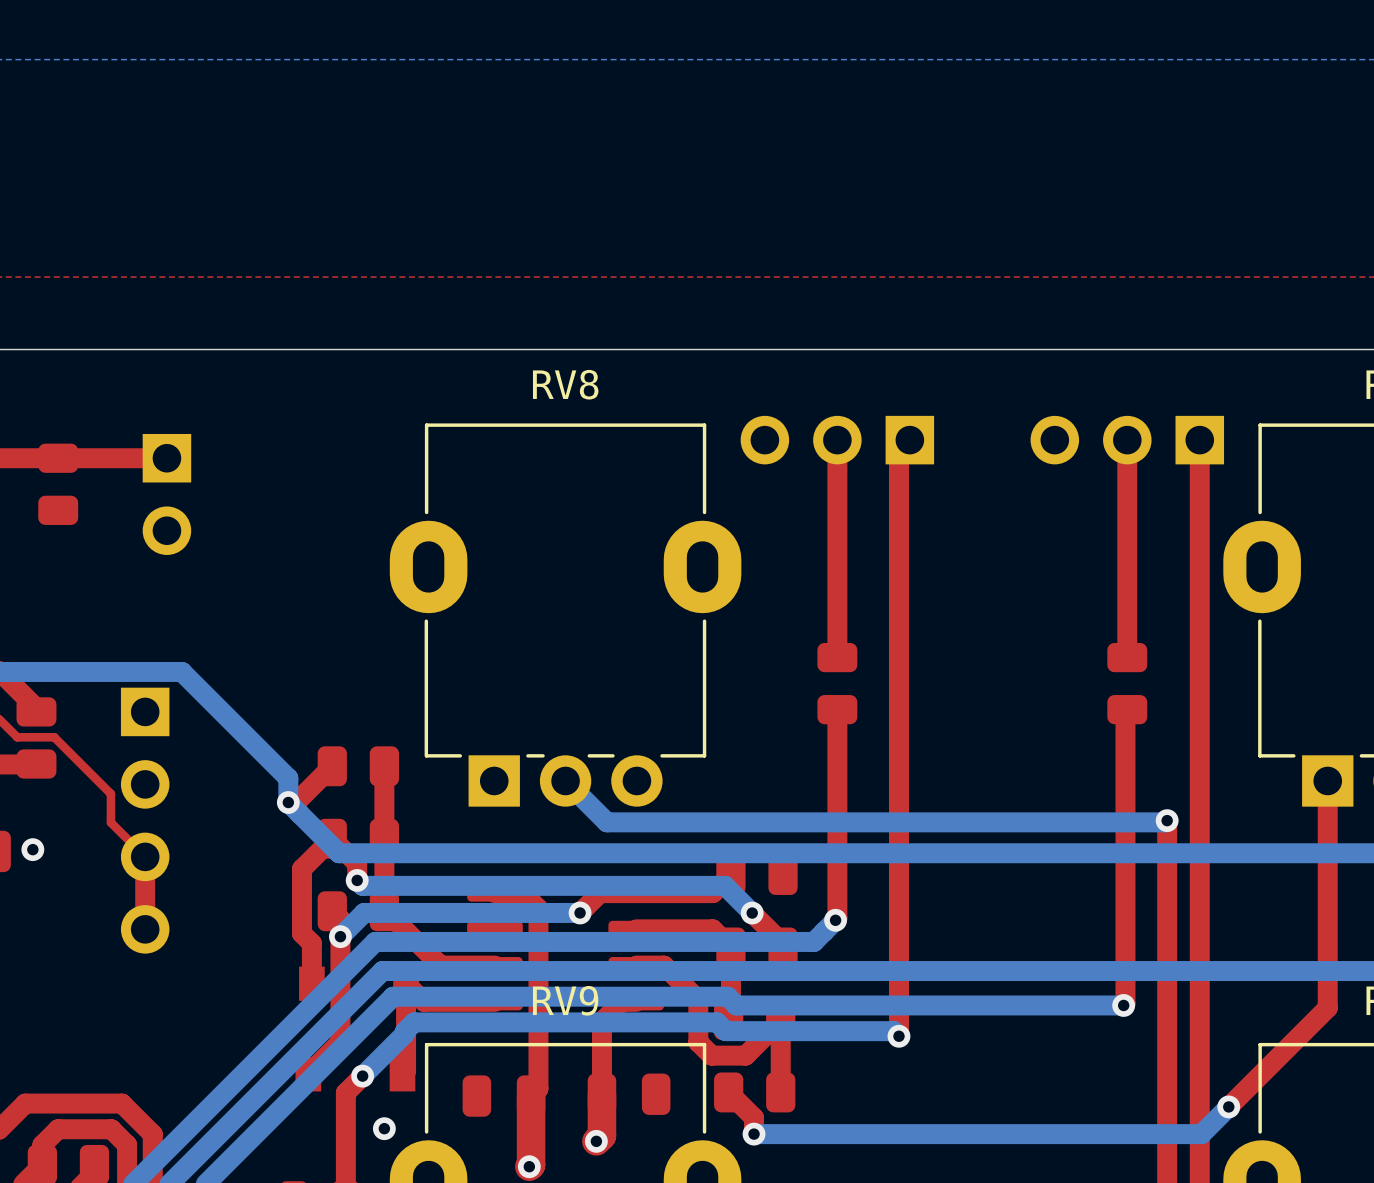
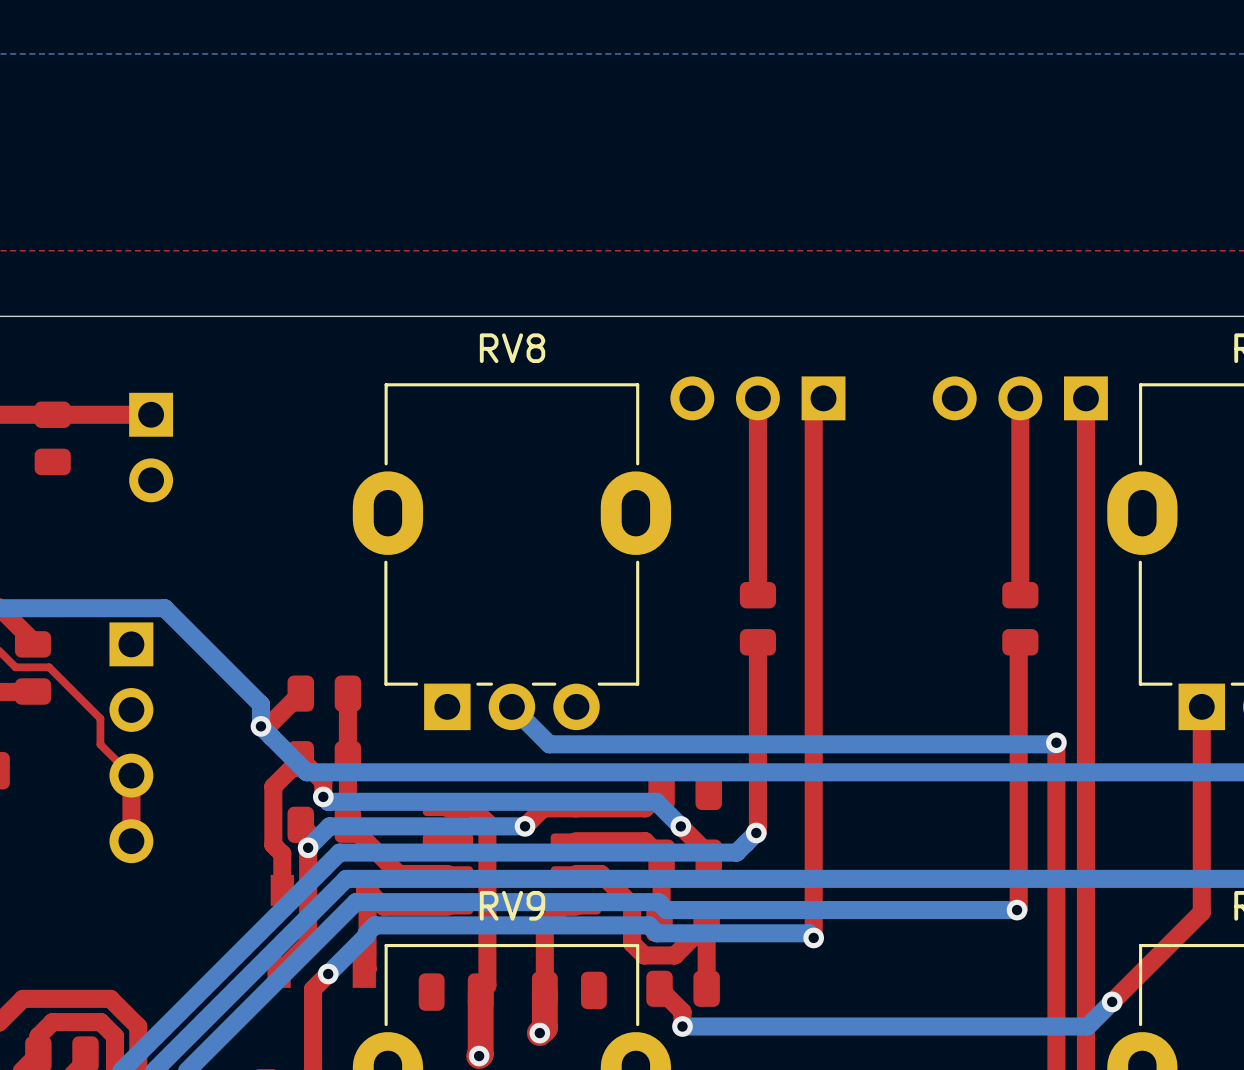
via: (32, 849) -> none
via: (384, 1128) -> none

